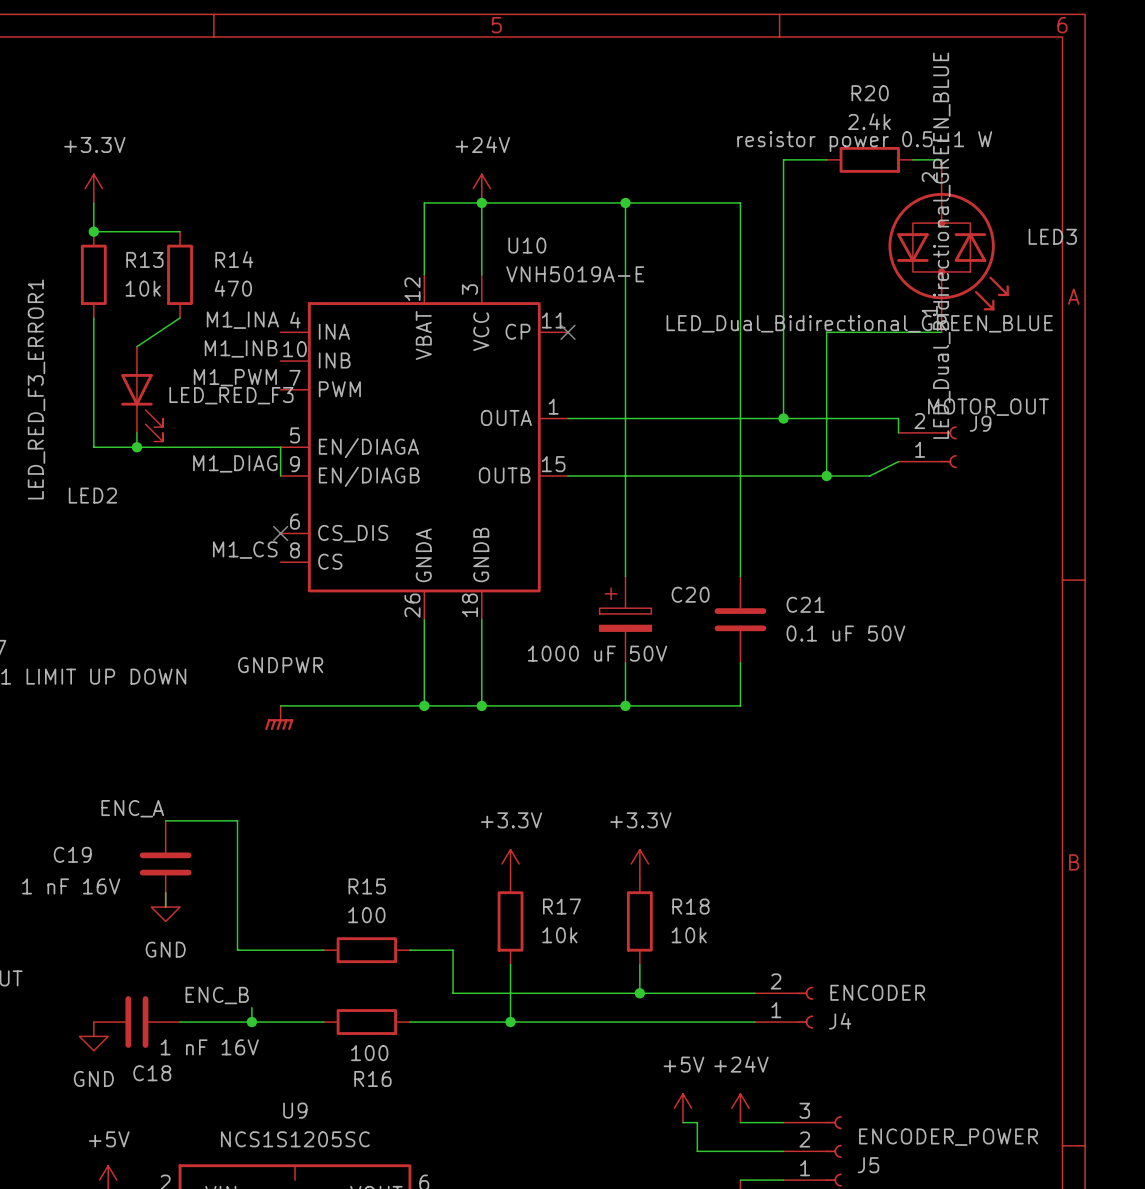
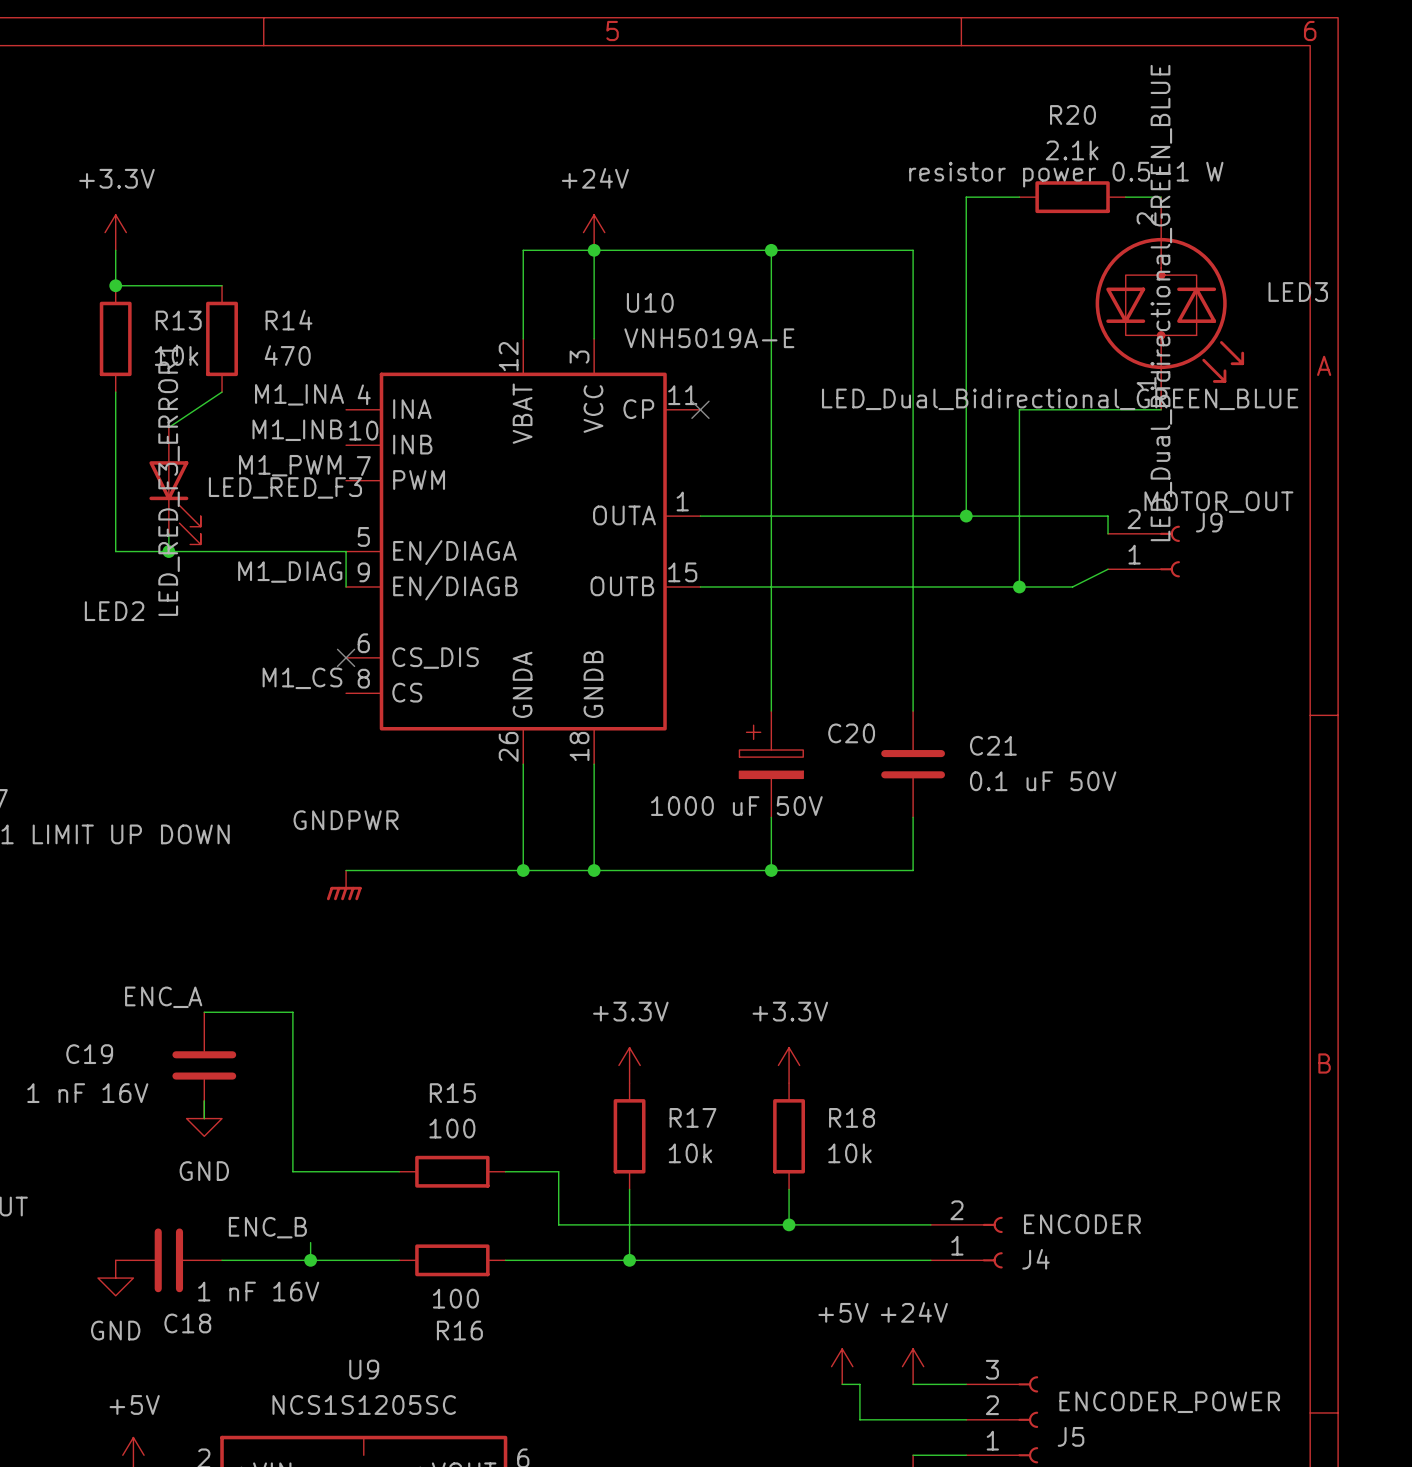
R20 value: 2.4k (869, 121) -> 2.1k (1072, 150)
LED2 text position: LED_RED_F3_ERROR1 (36, 389) -> LED_RED_F3_ERROR1 (169, 480)

